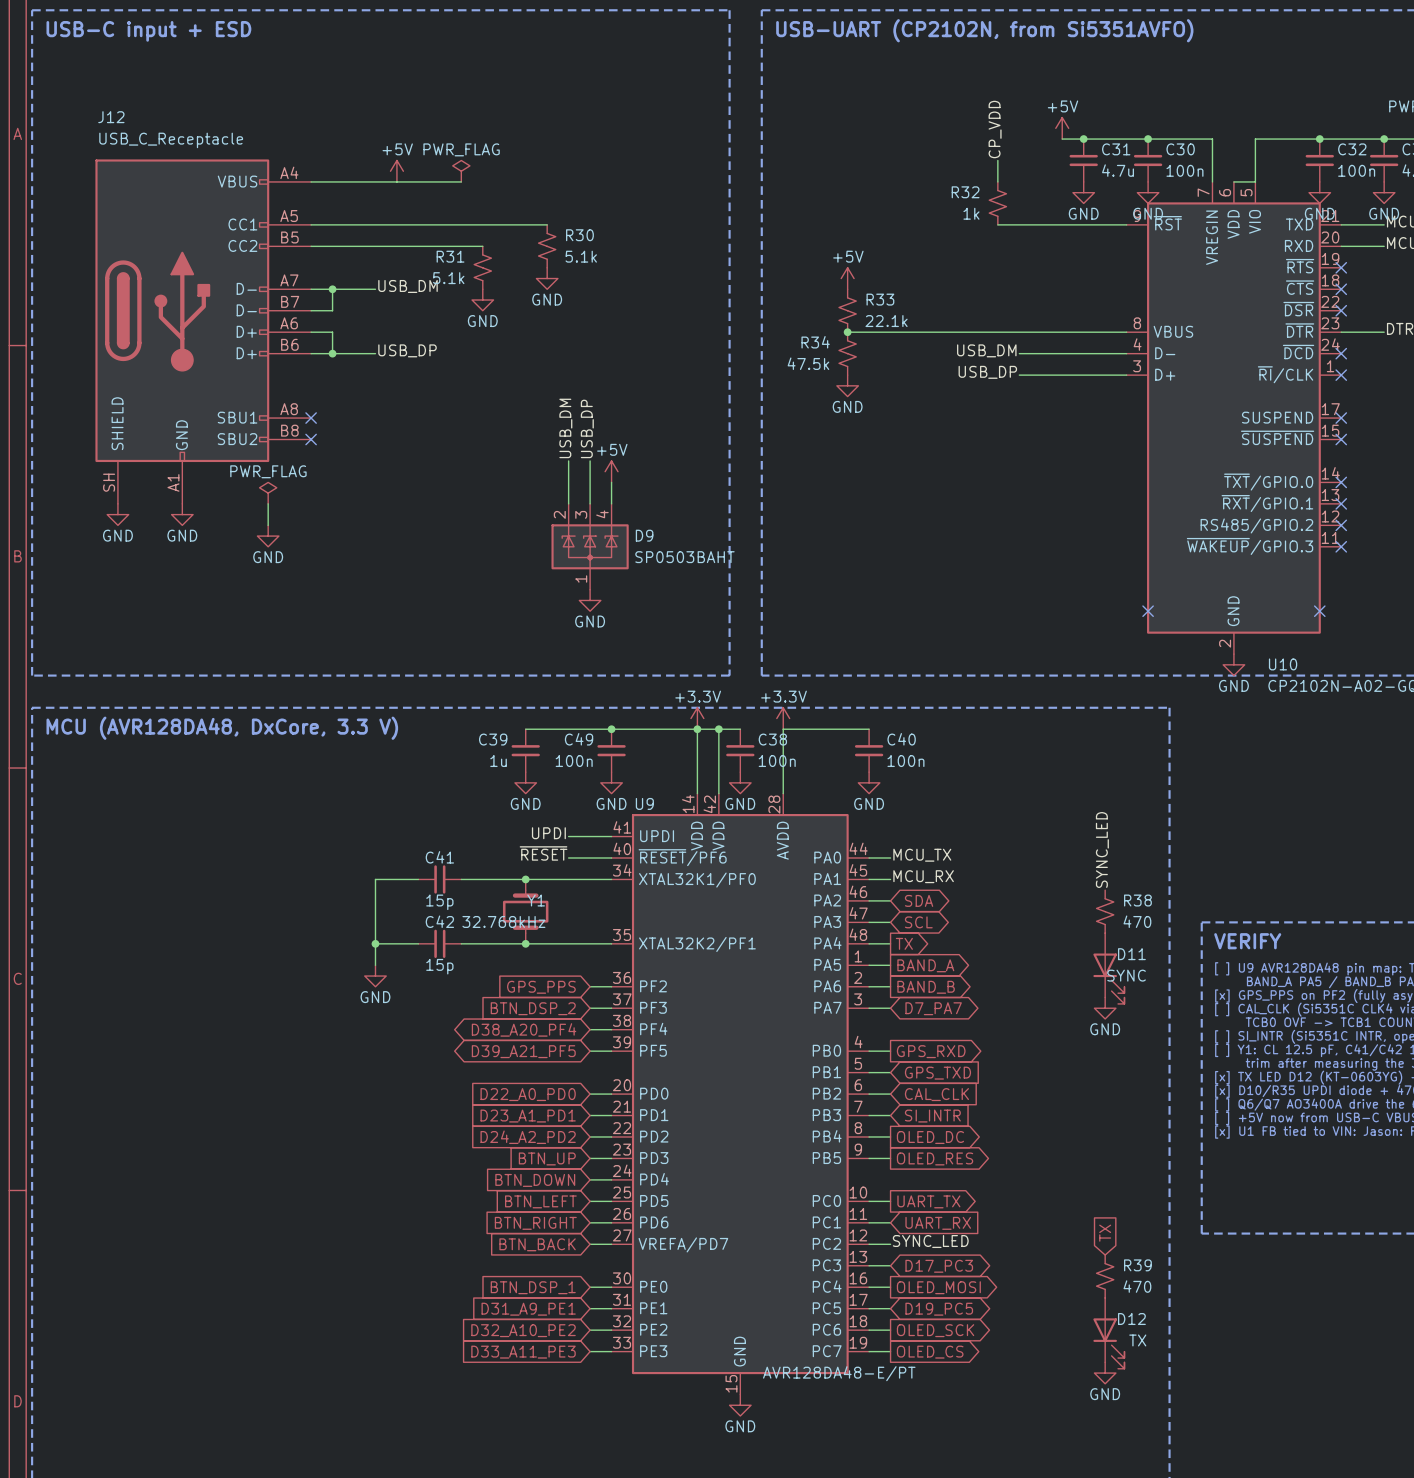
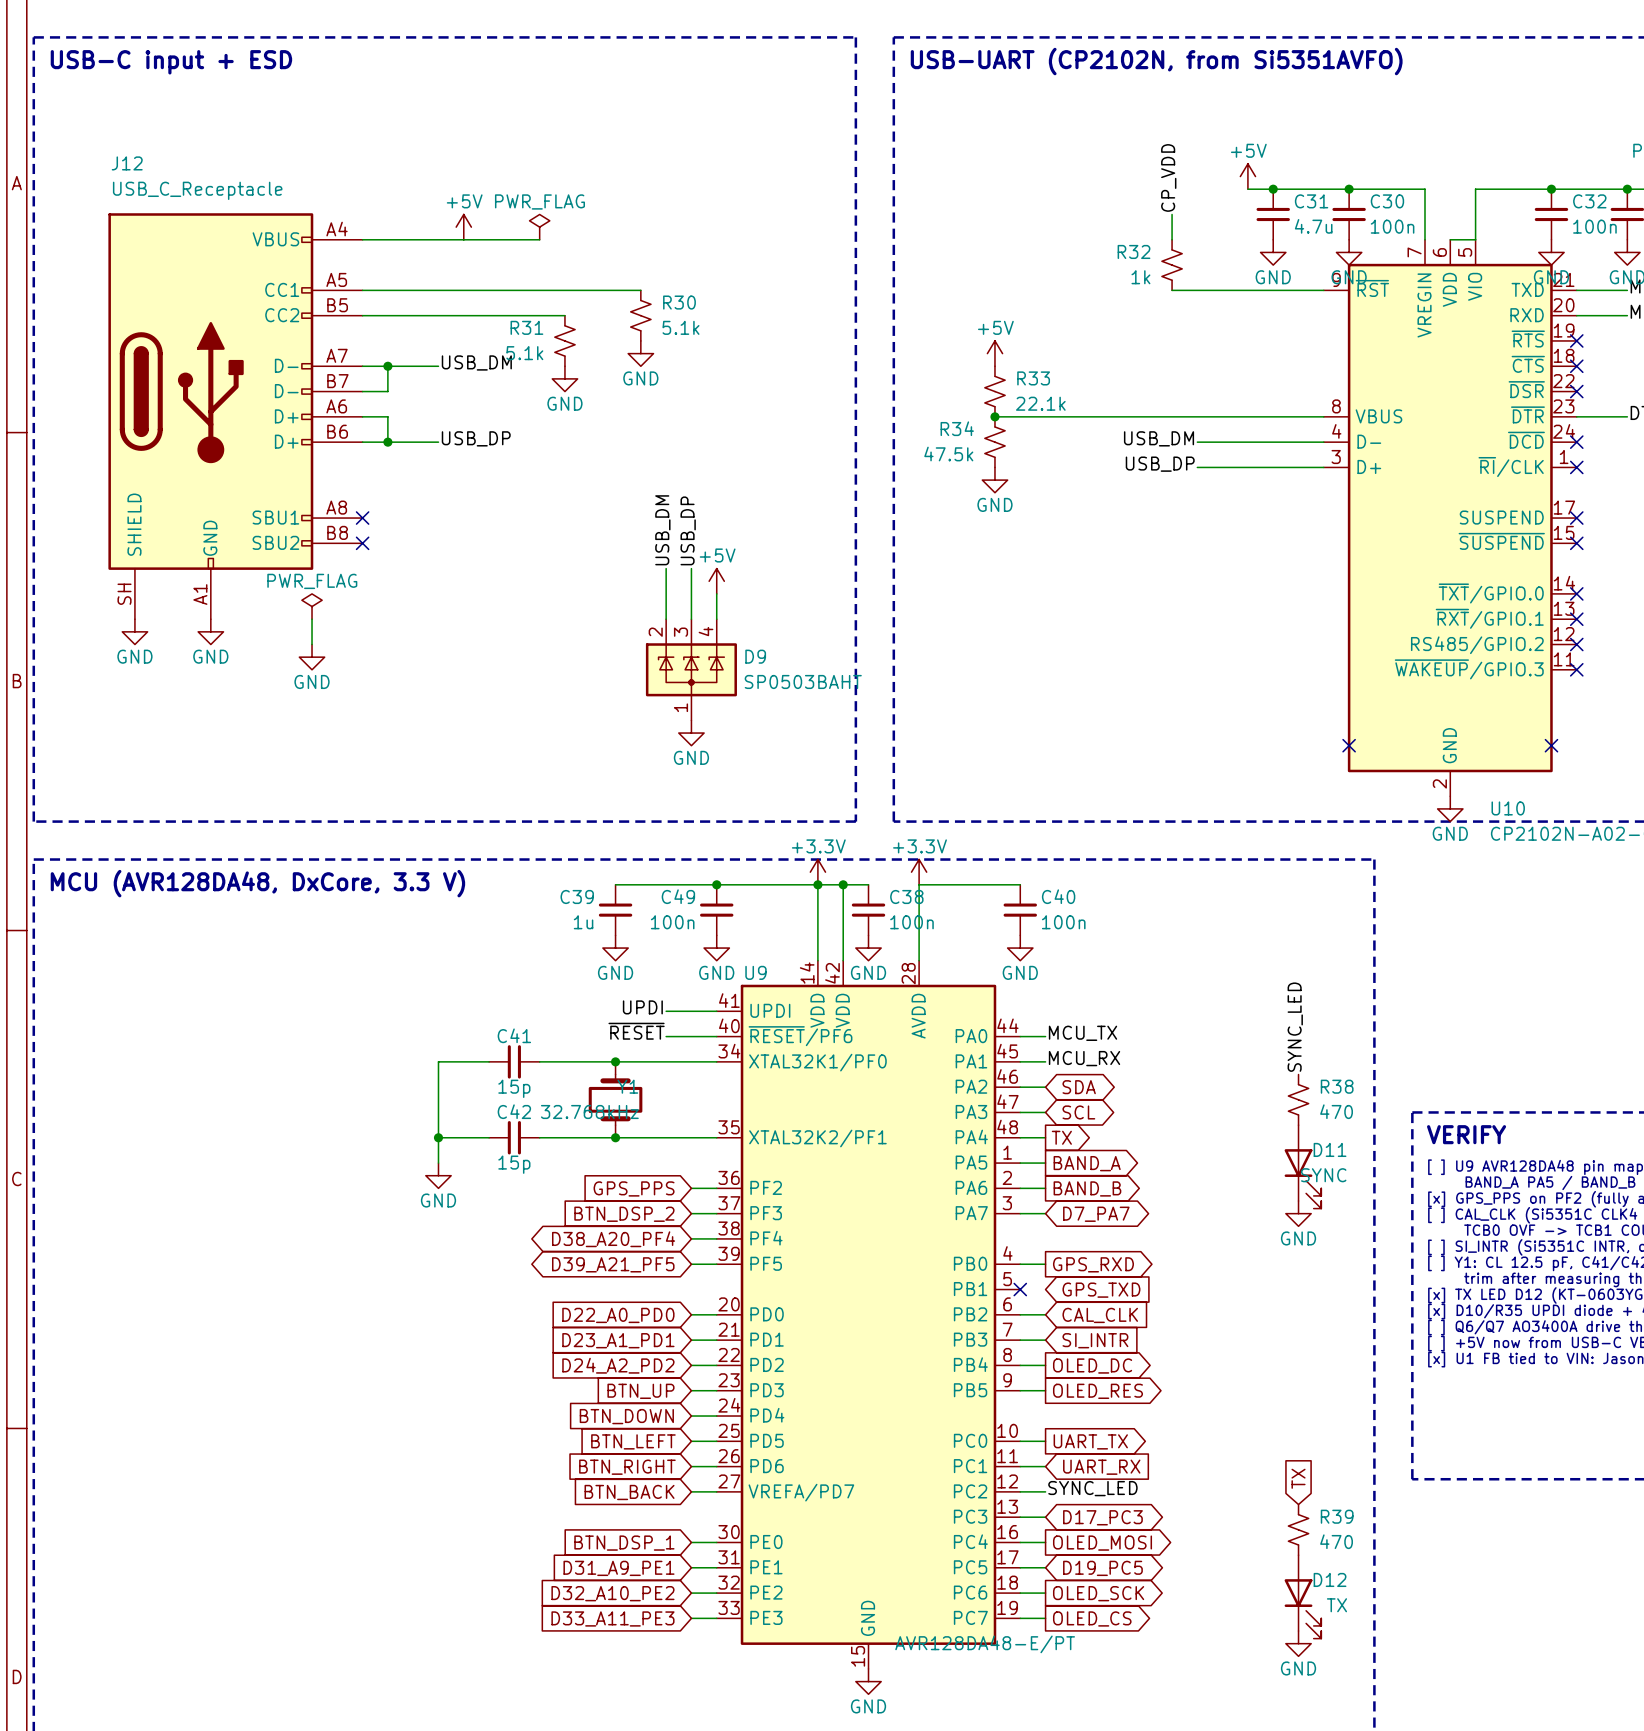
wire: (869, 1072) (890, 1072) -> none
no-connect mark: none -> (1020, 1289)

